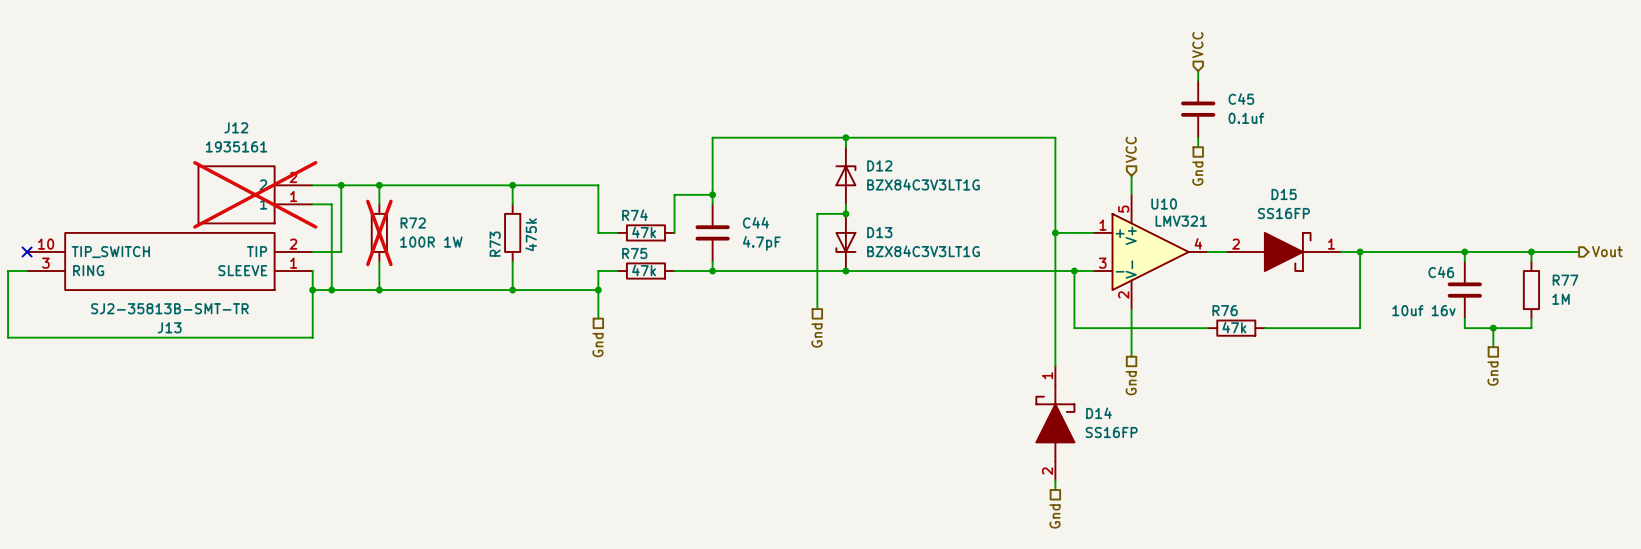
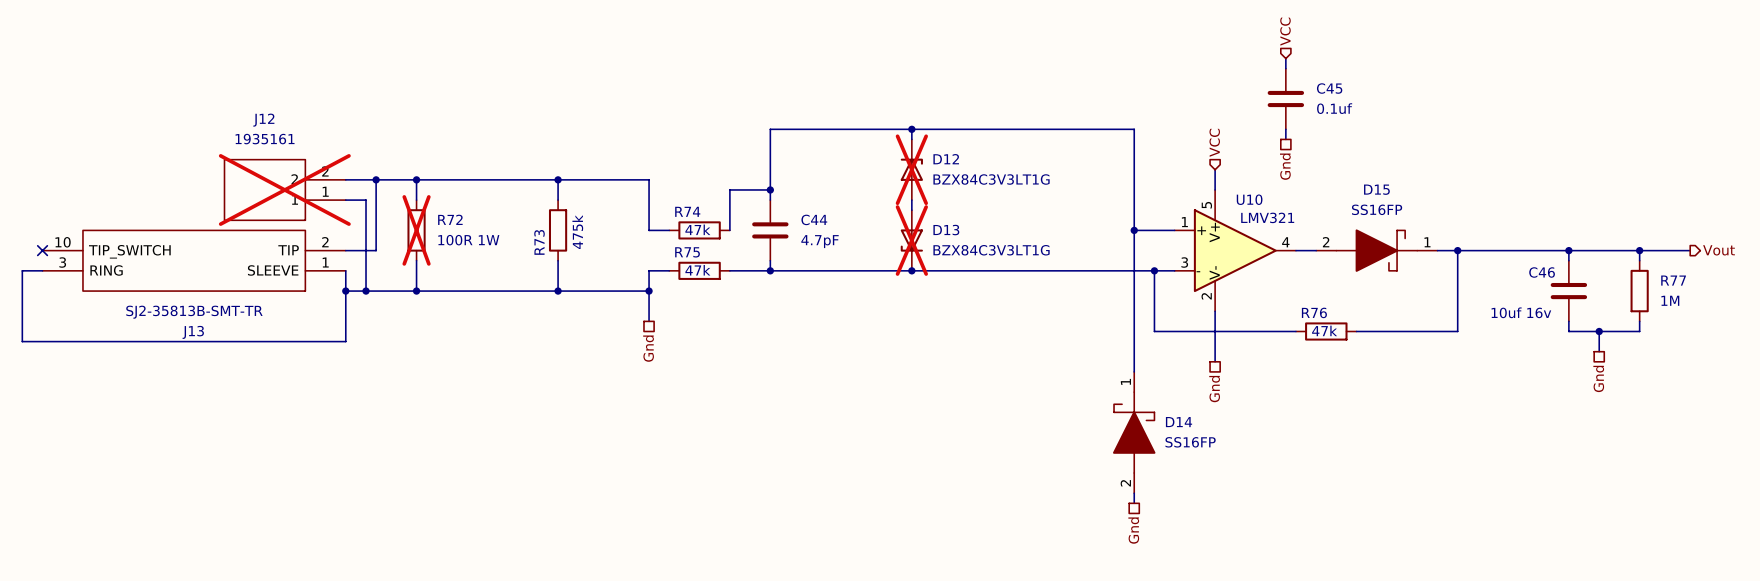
D12 do-not-place cross: none -> (911, 169)
wire: (845, 213) (817, 213) (817, 309) -> none
junction: (845, 213) -> none
D13 do-not-place cross: none -> (911, 240)
hierarchical label: Gnd (816, 335) -> none

